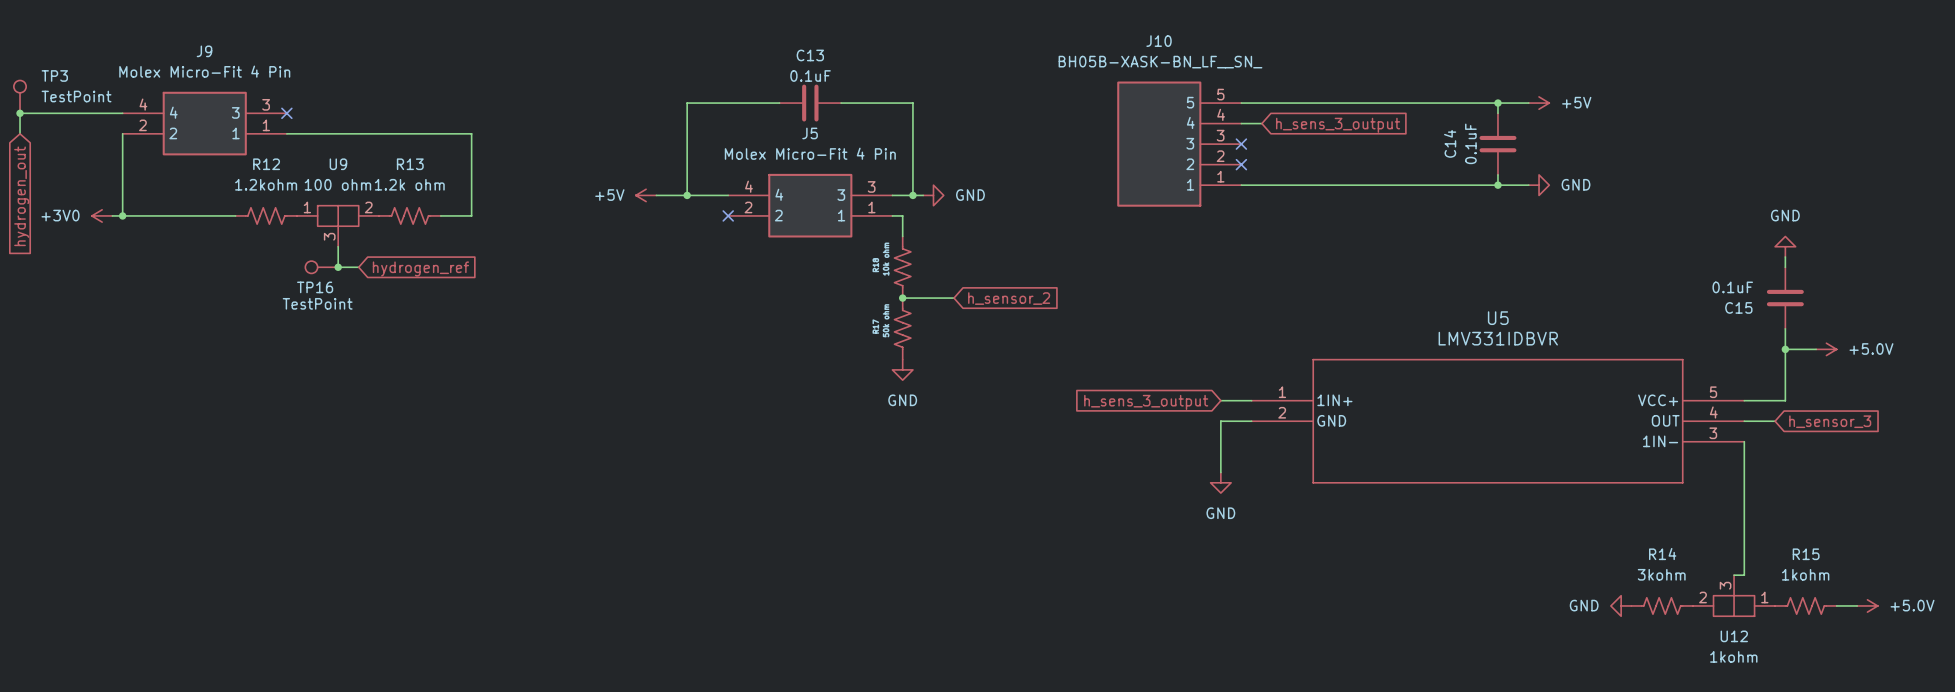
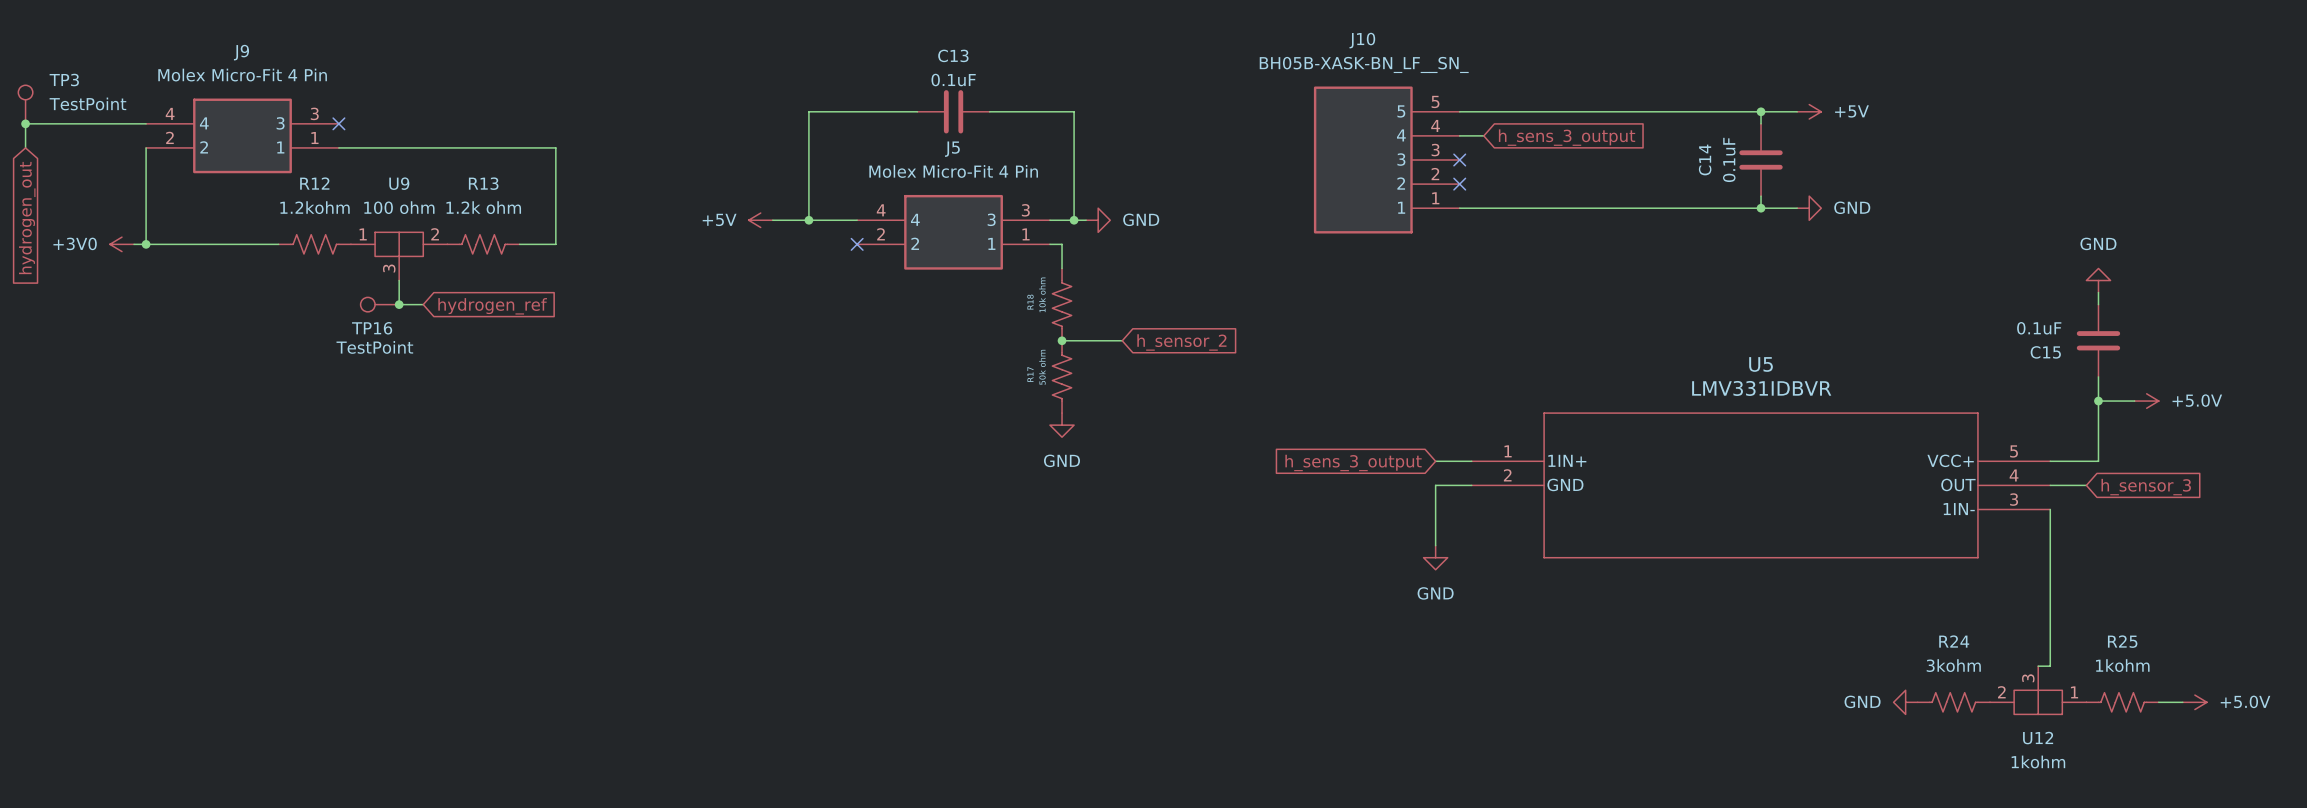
R14 name: R14 (1662, 554) -> R24 (1954, 641)
R15 name: R15 (1806, 554) -> R25 (2122, 641)

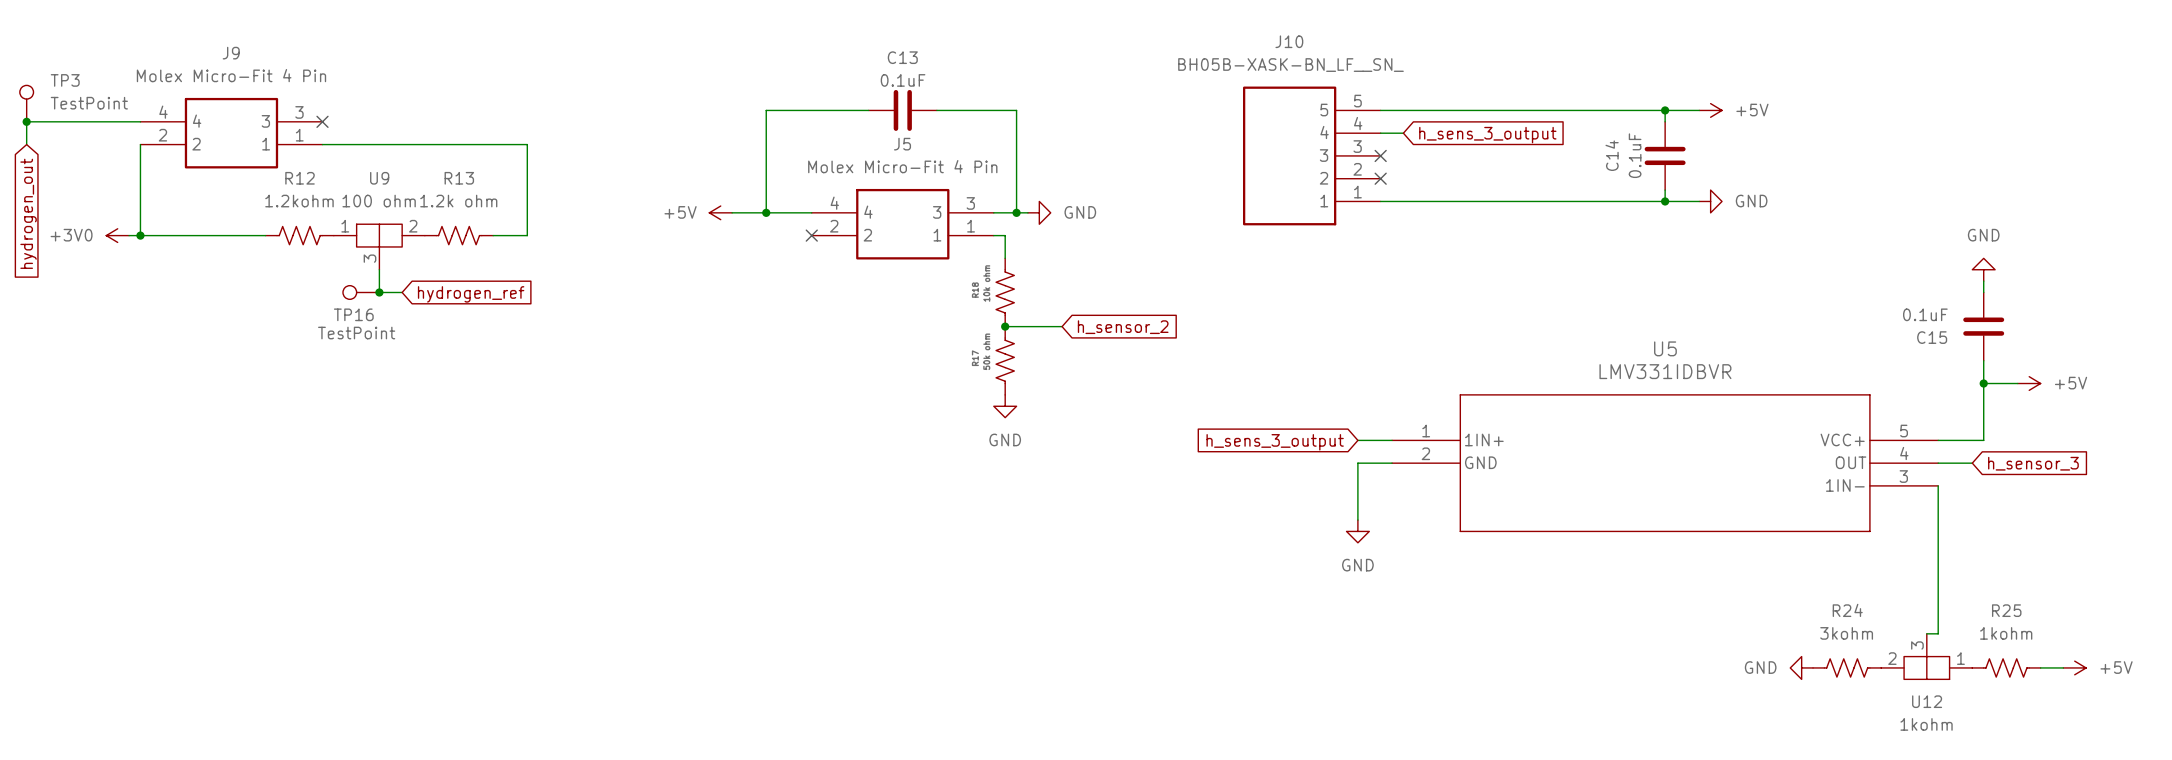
power symbol: +5.0V (2146, 401) -> +5V (2029, 383)
power symbol: +5.0V (2194, 702) -> +5V (2074, 667)

